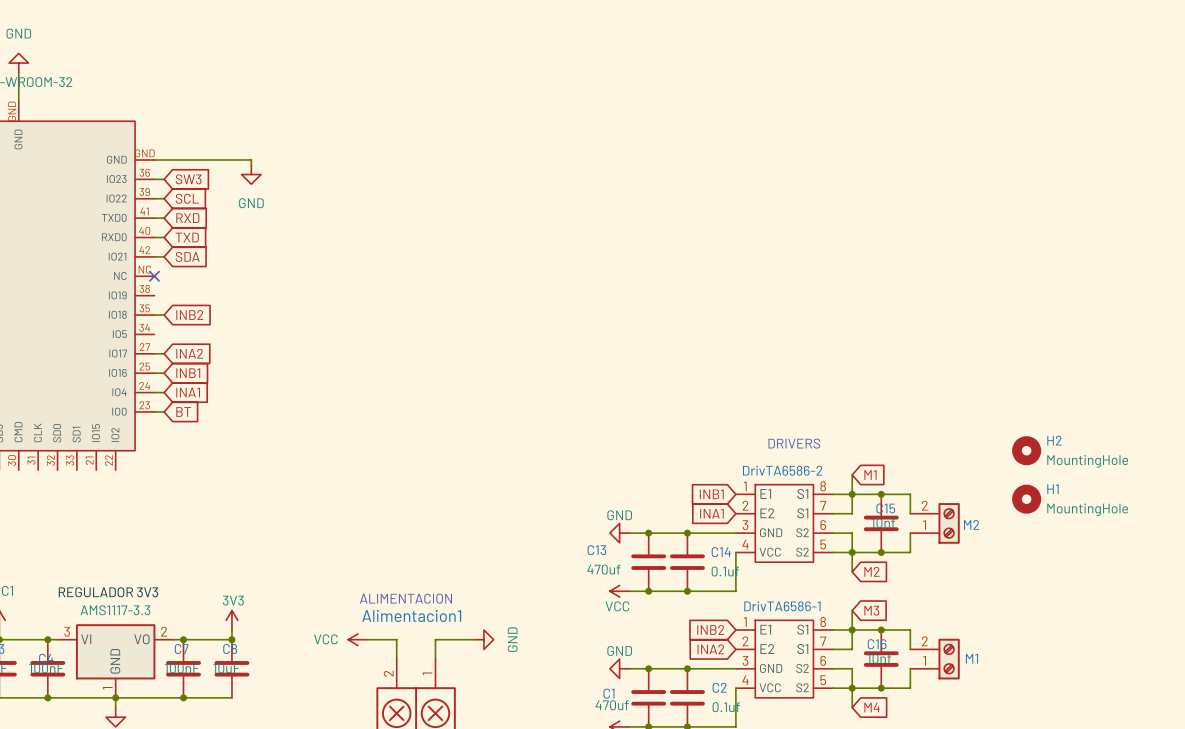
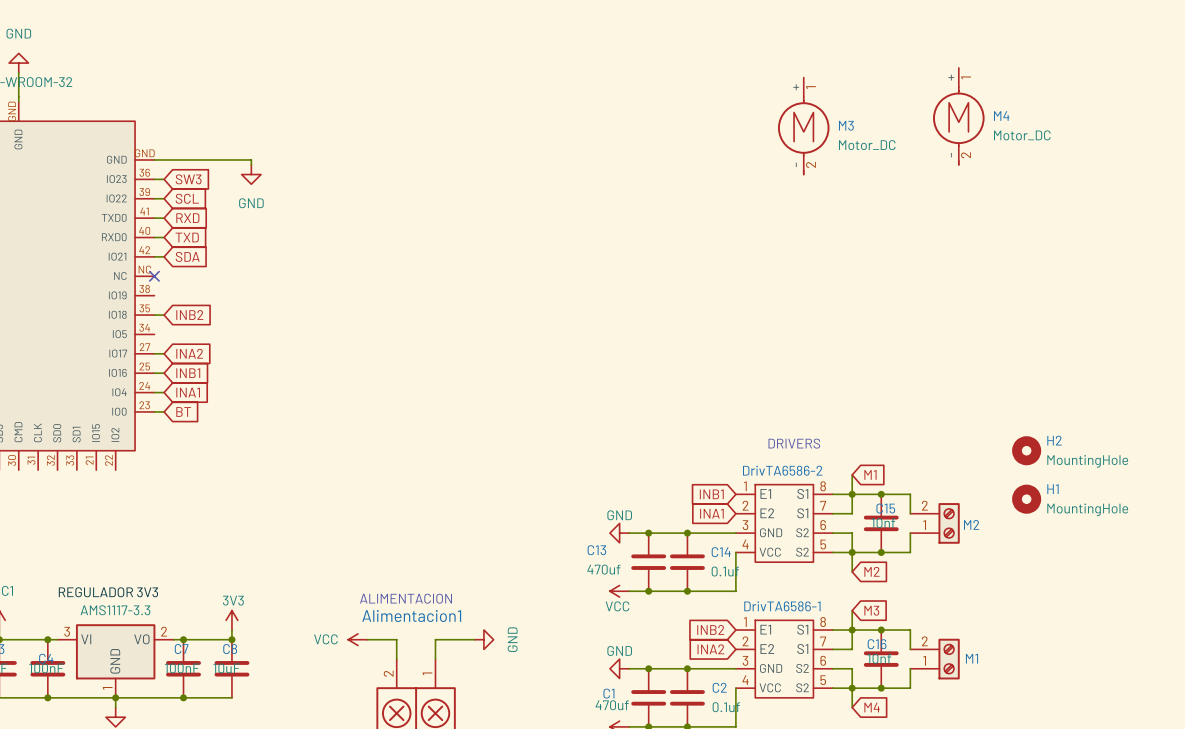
M4: none -> Motor_DC (958, 116)
M3: none -> Motor_DC (803, 126)

